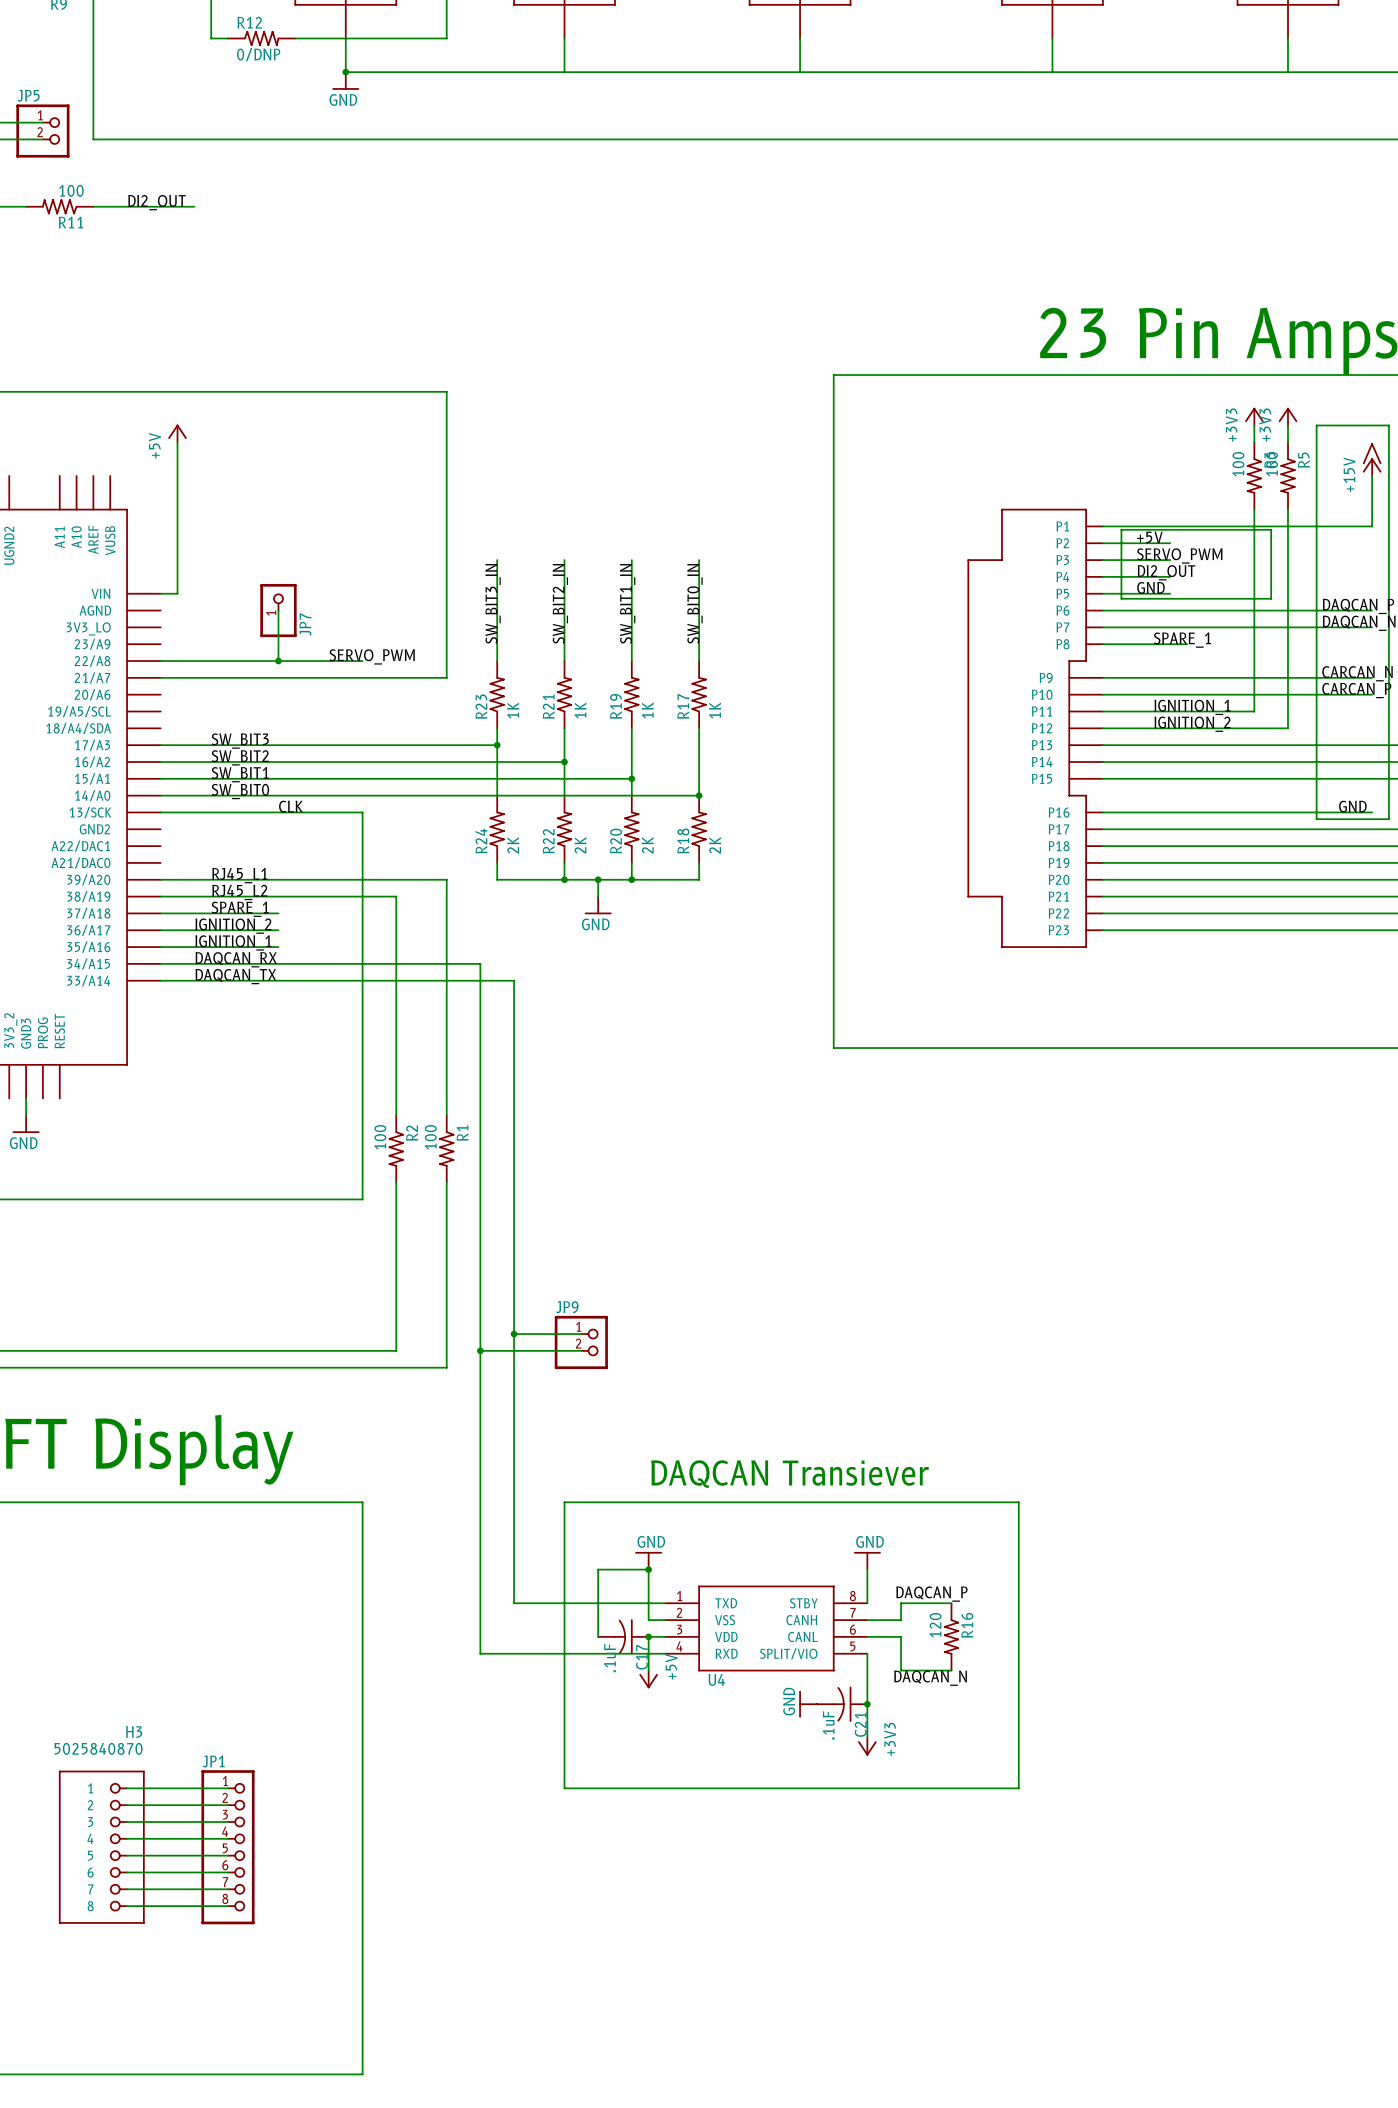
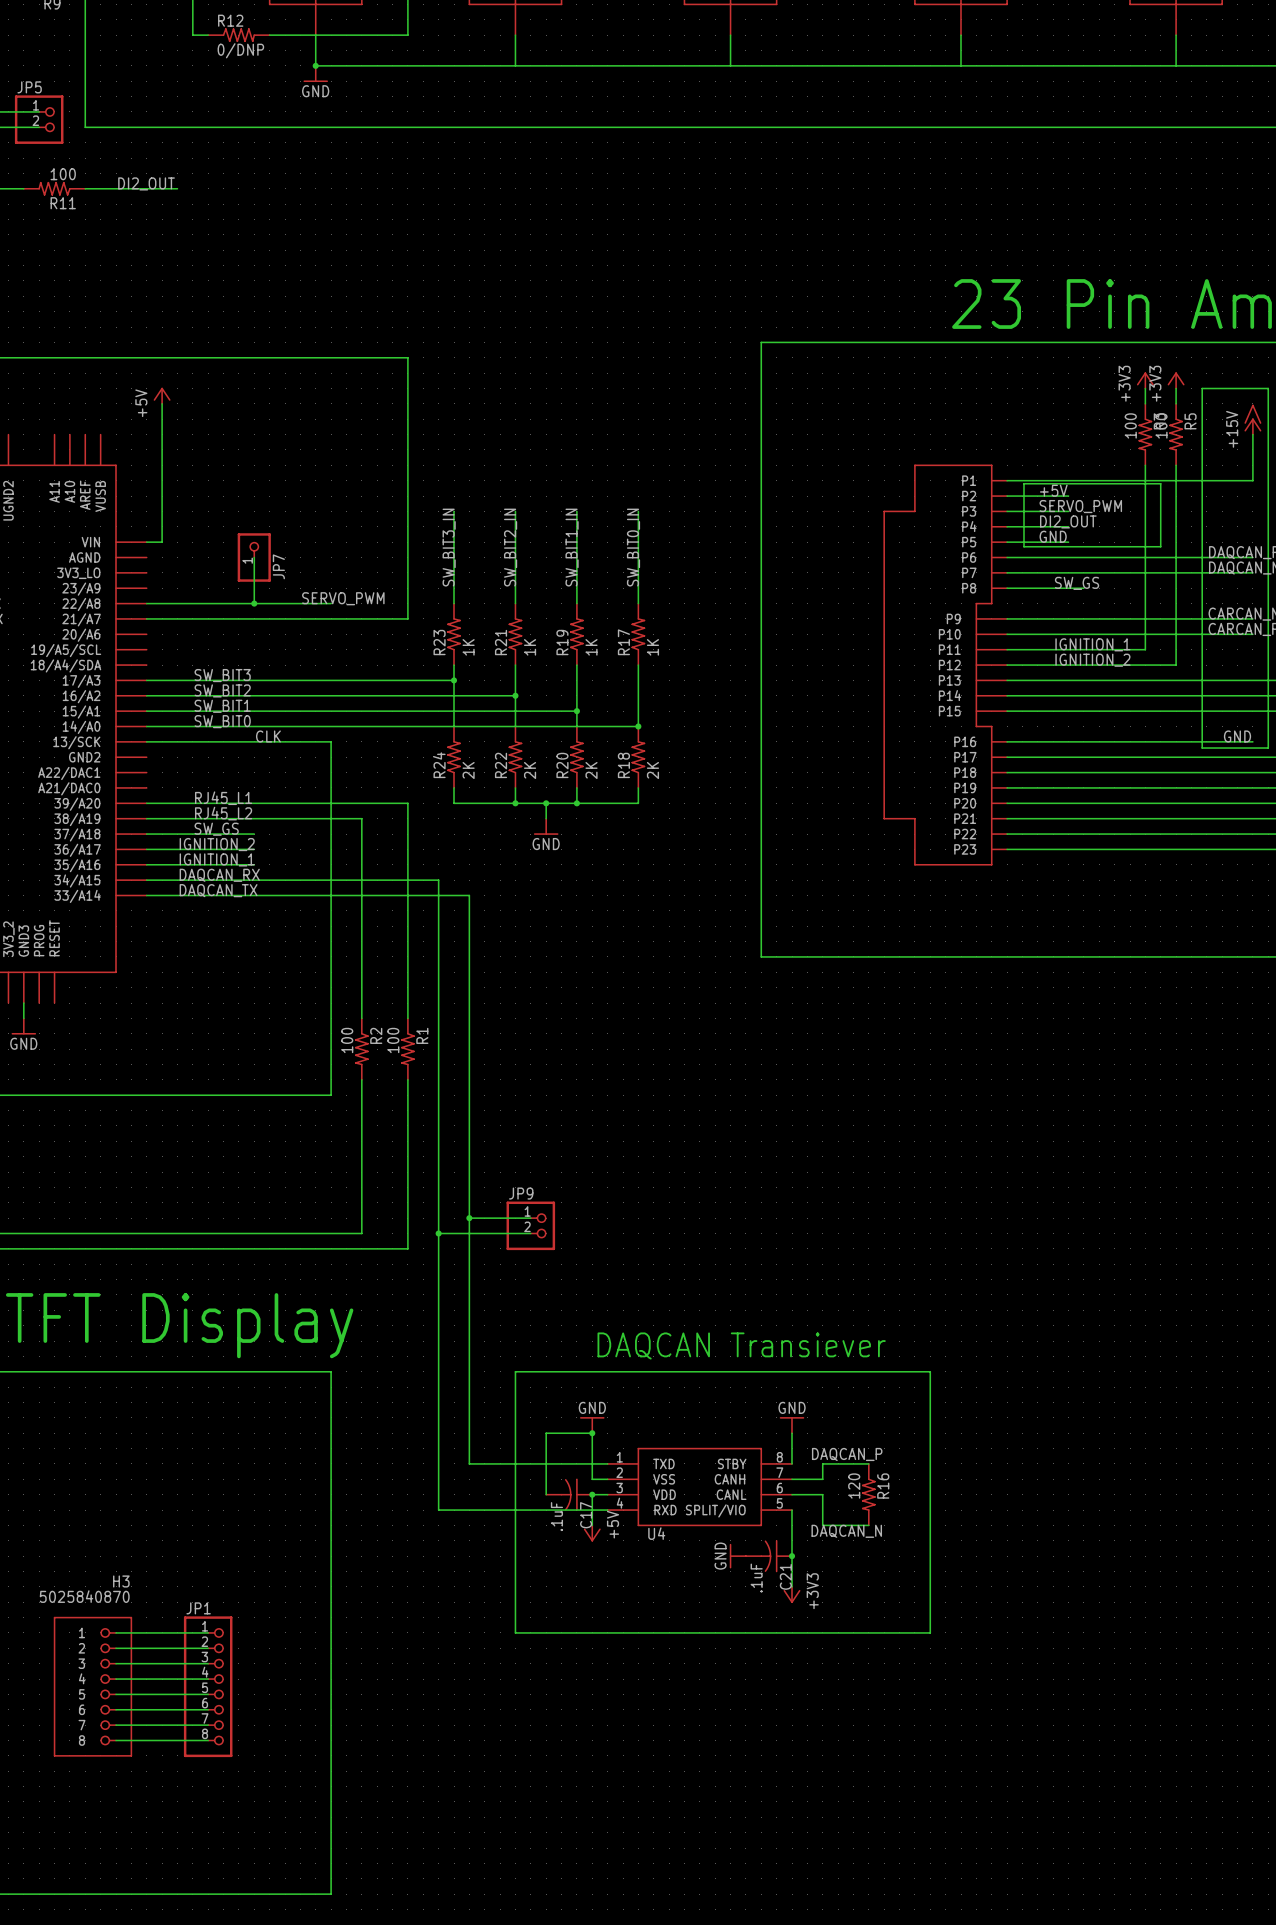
label: SPARE_1 (1182, 640) -> SW_GS (1077, 583)
label: SPARE_1 (240, 909) -> SW_GS (216, 829)

